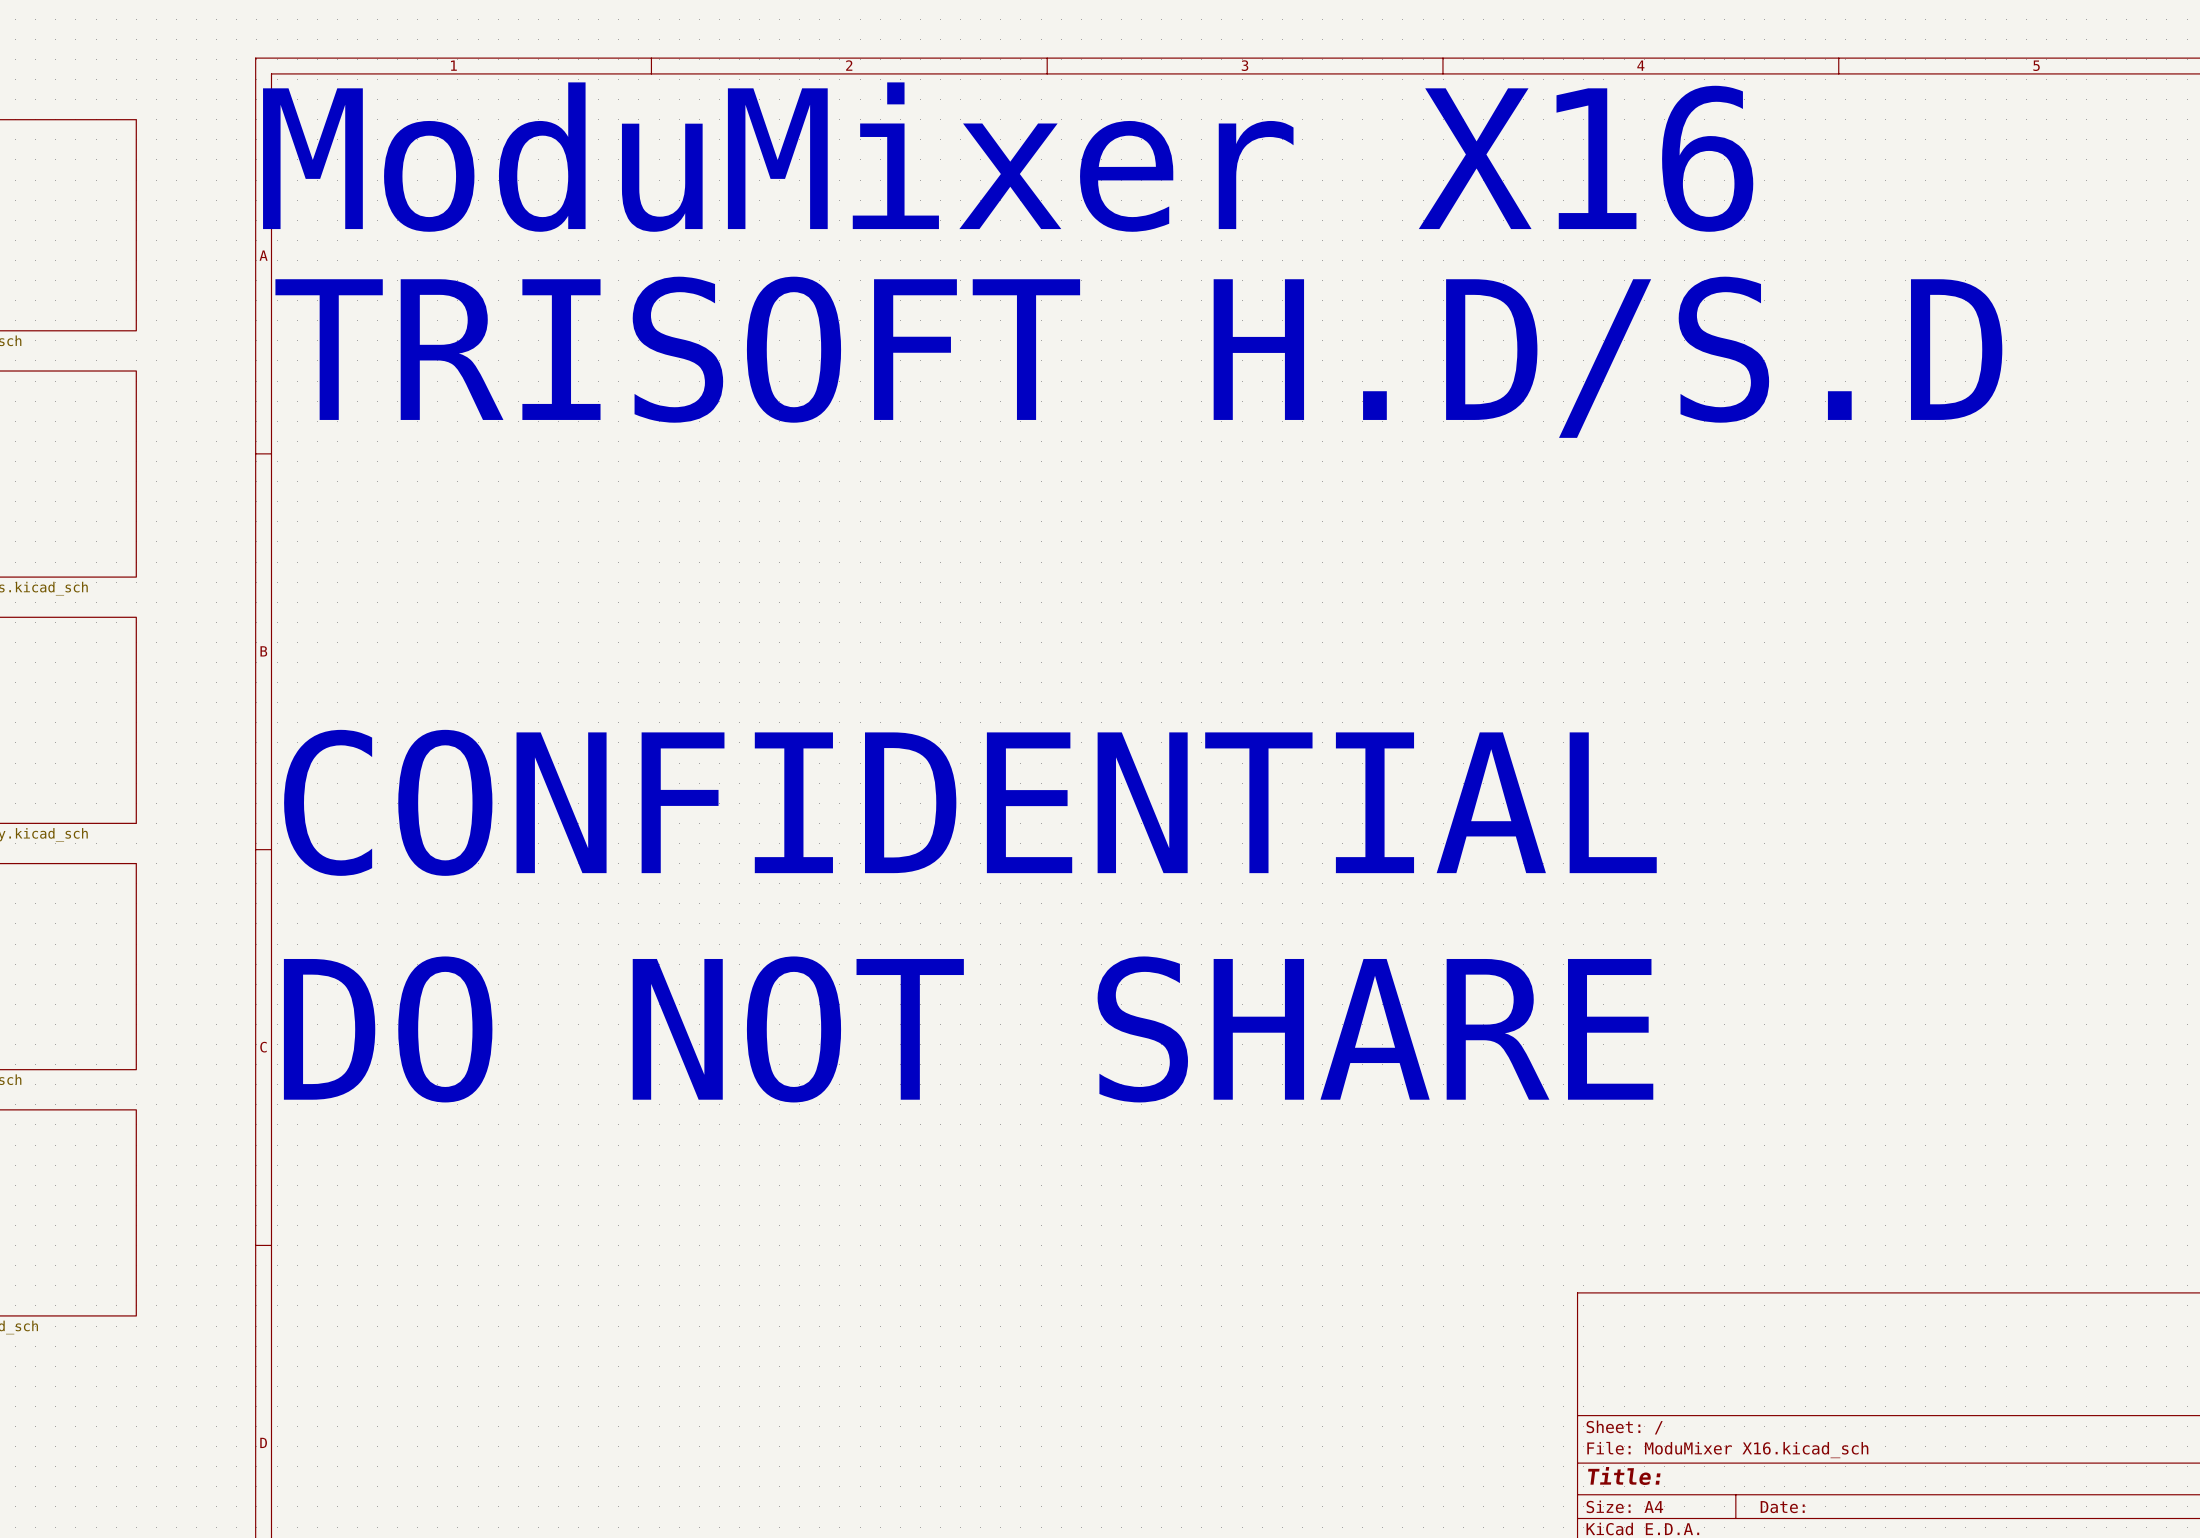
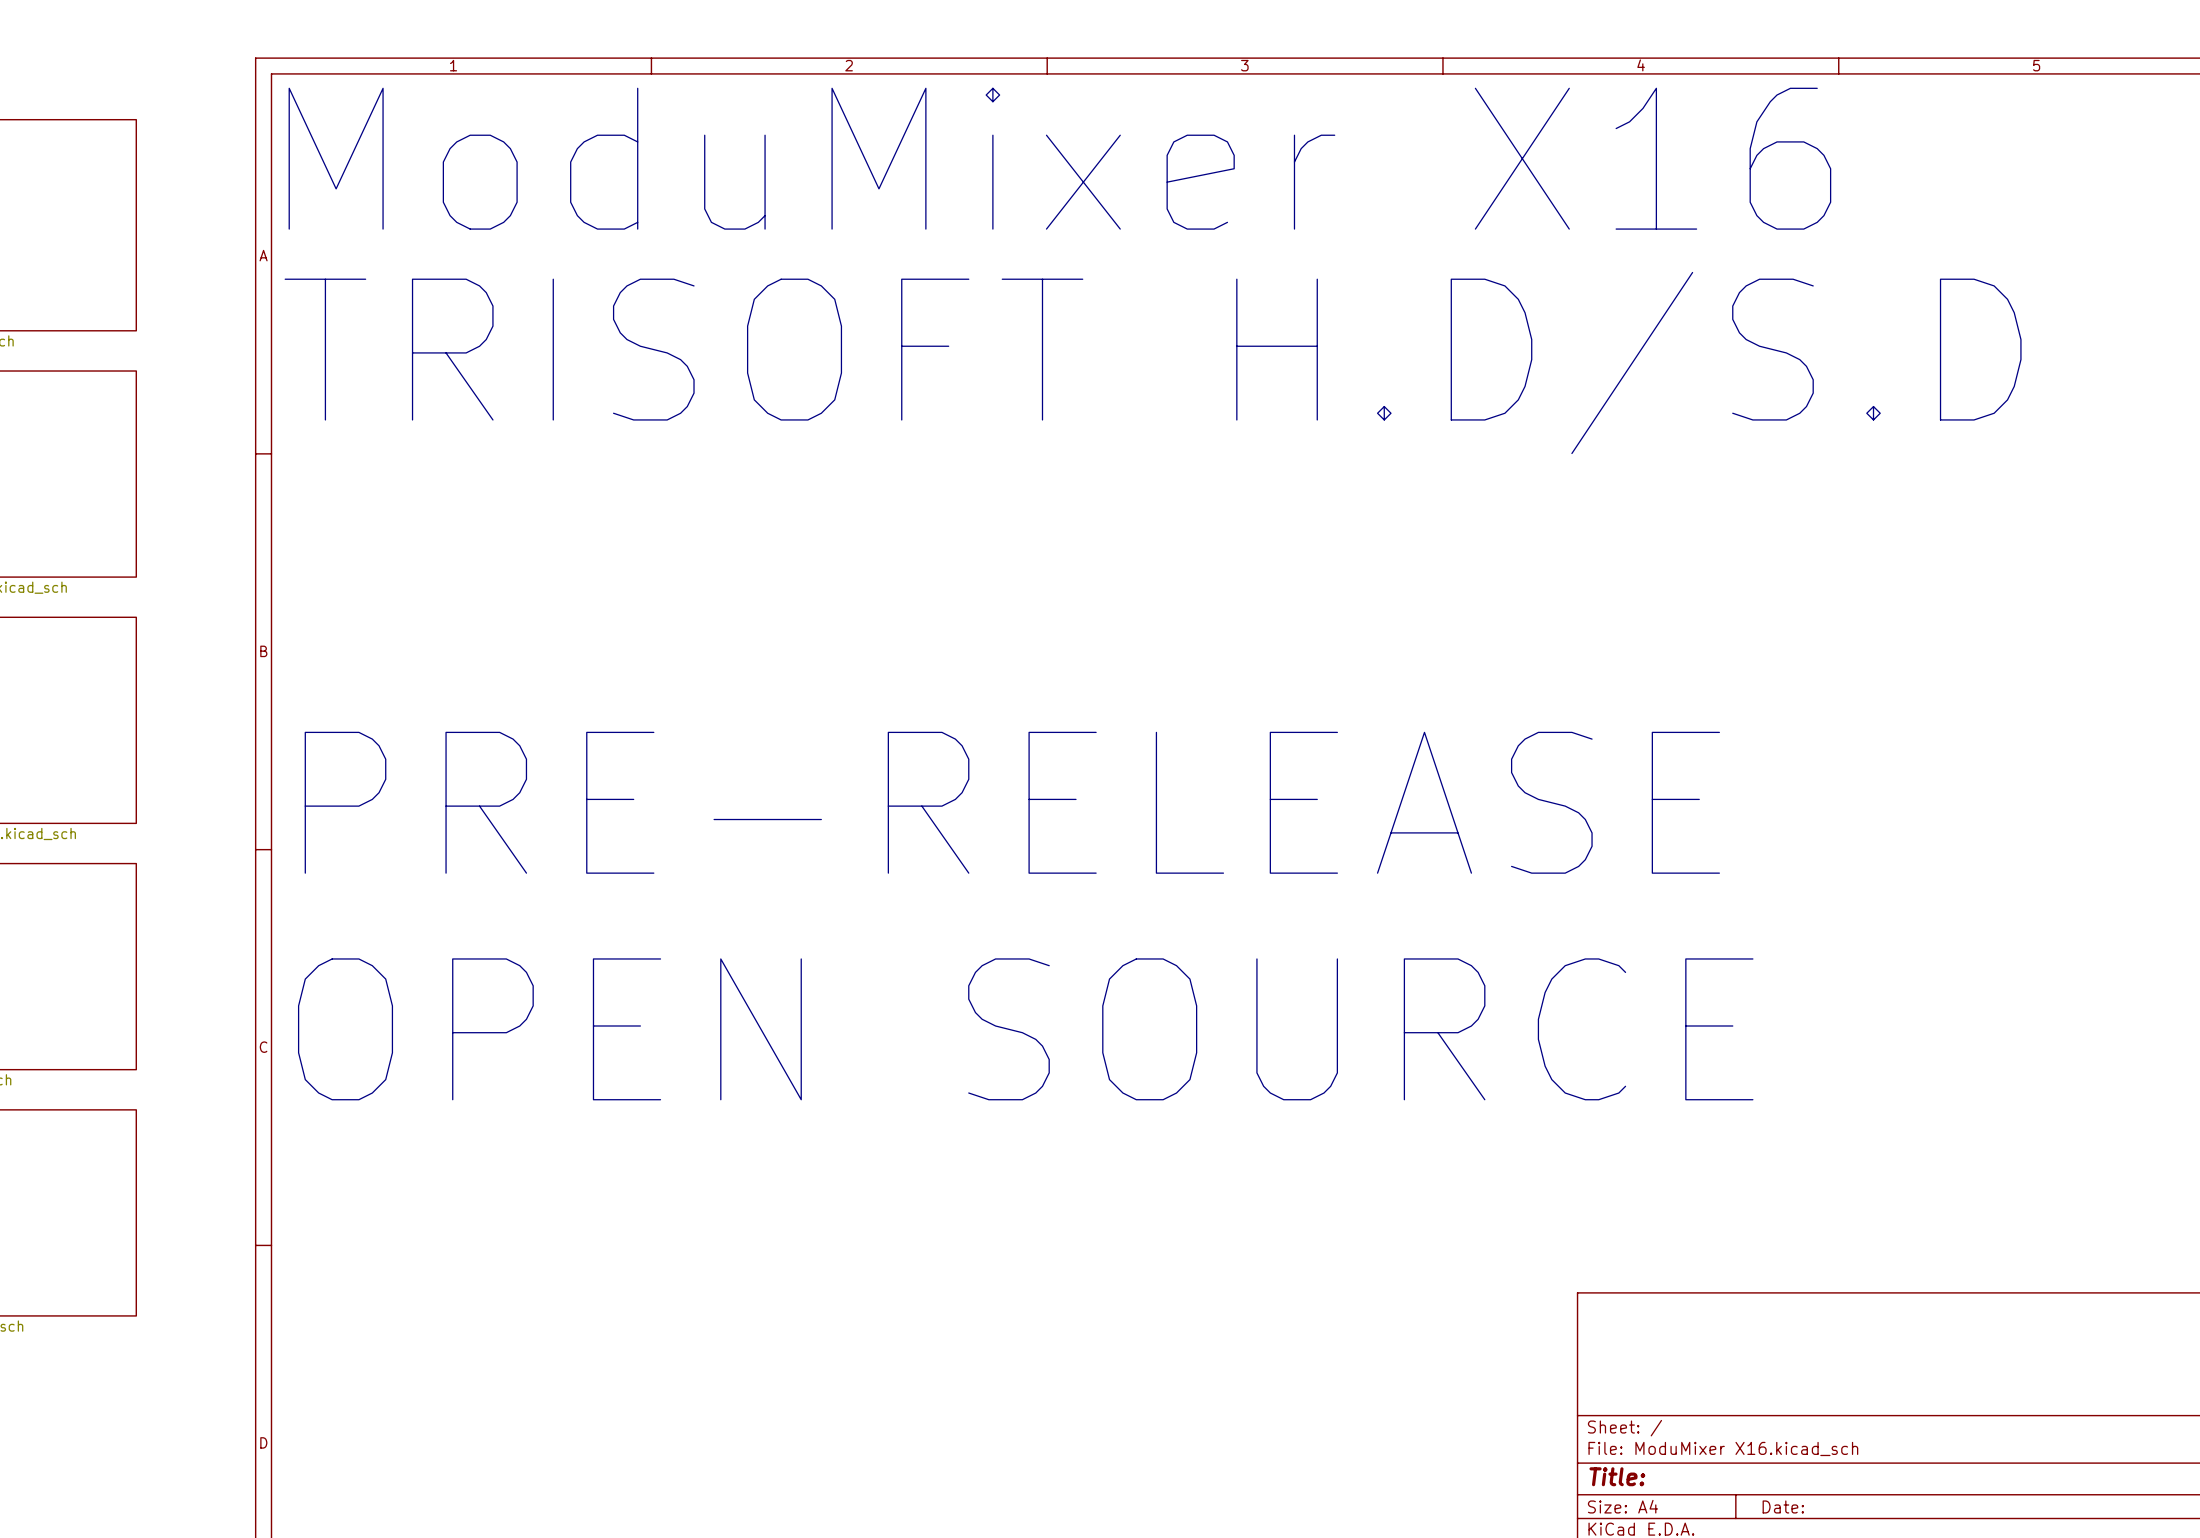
text: CONFIDENTIAL (970, 802) -> PRE-RELEASE (1012, 802)
text: DO NOT SHARE (968, 1029) -> OPEN SOURCE (1025, 1029)

